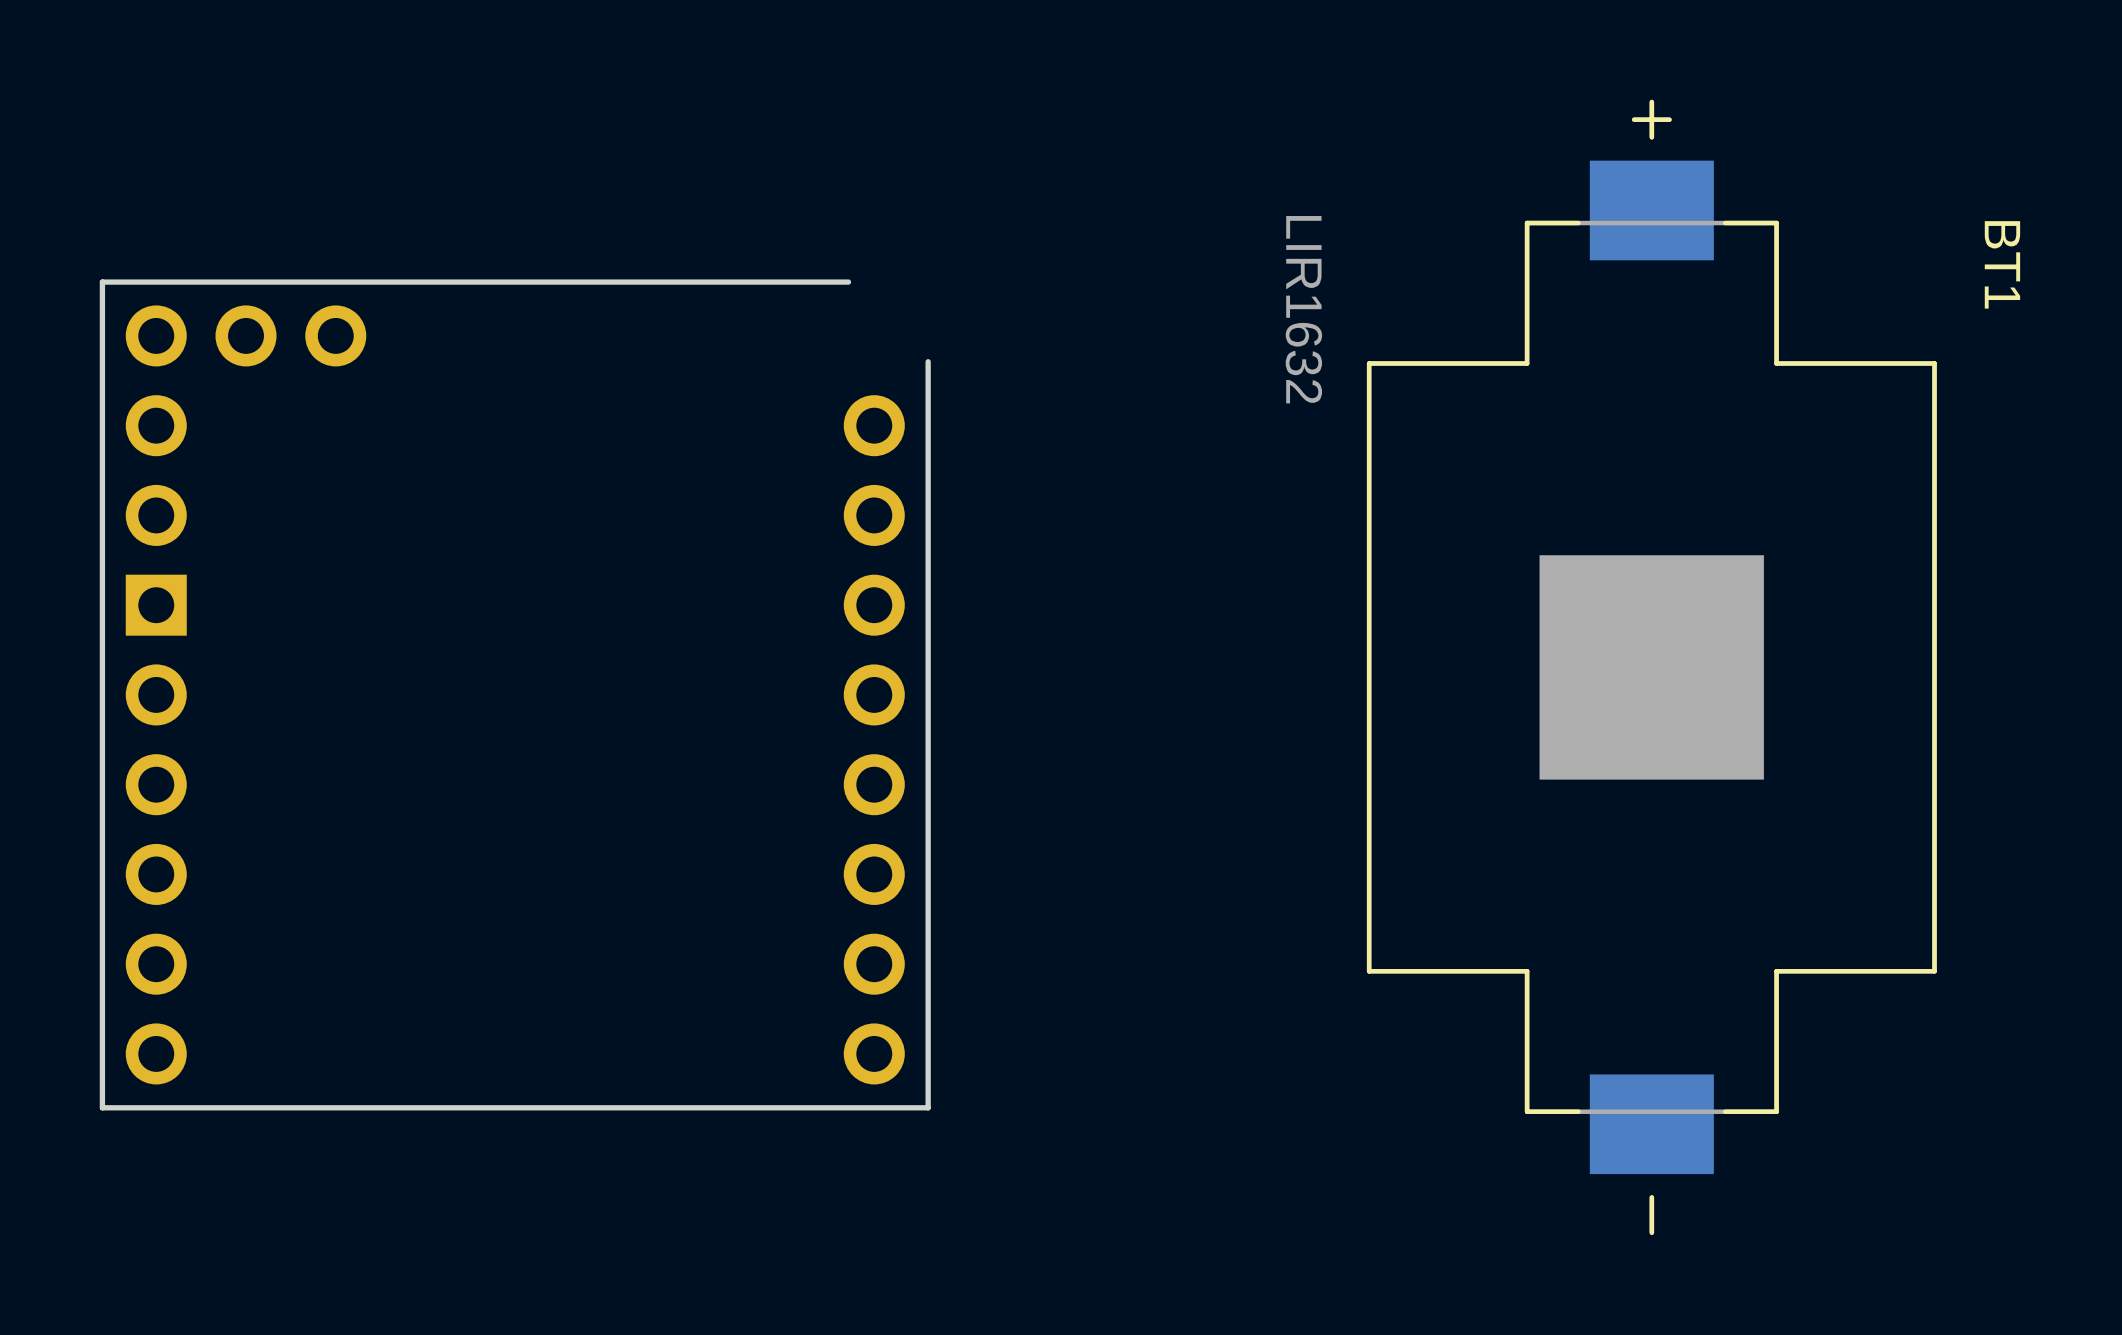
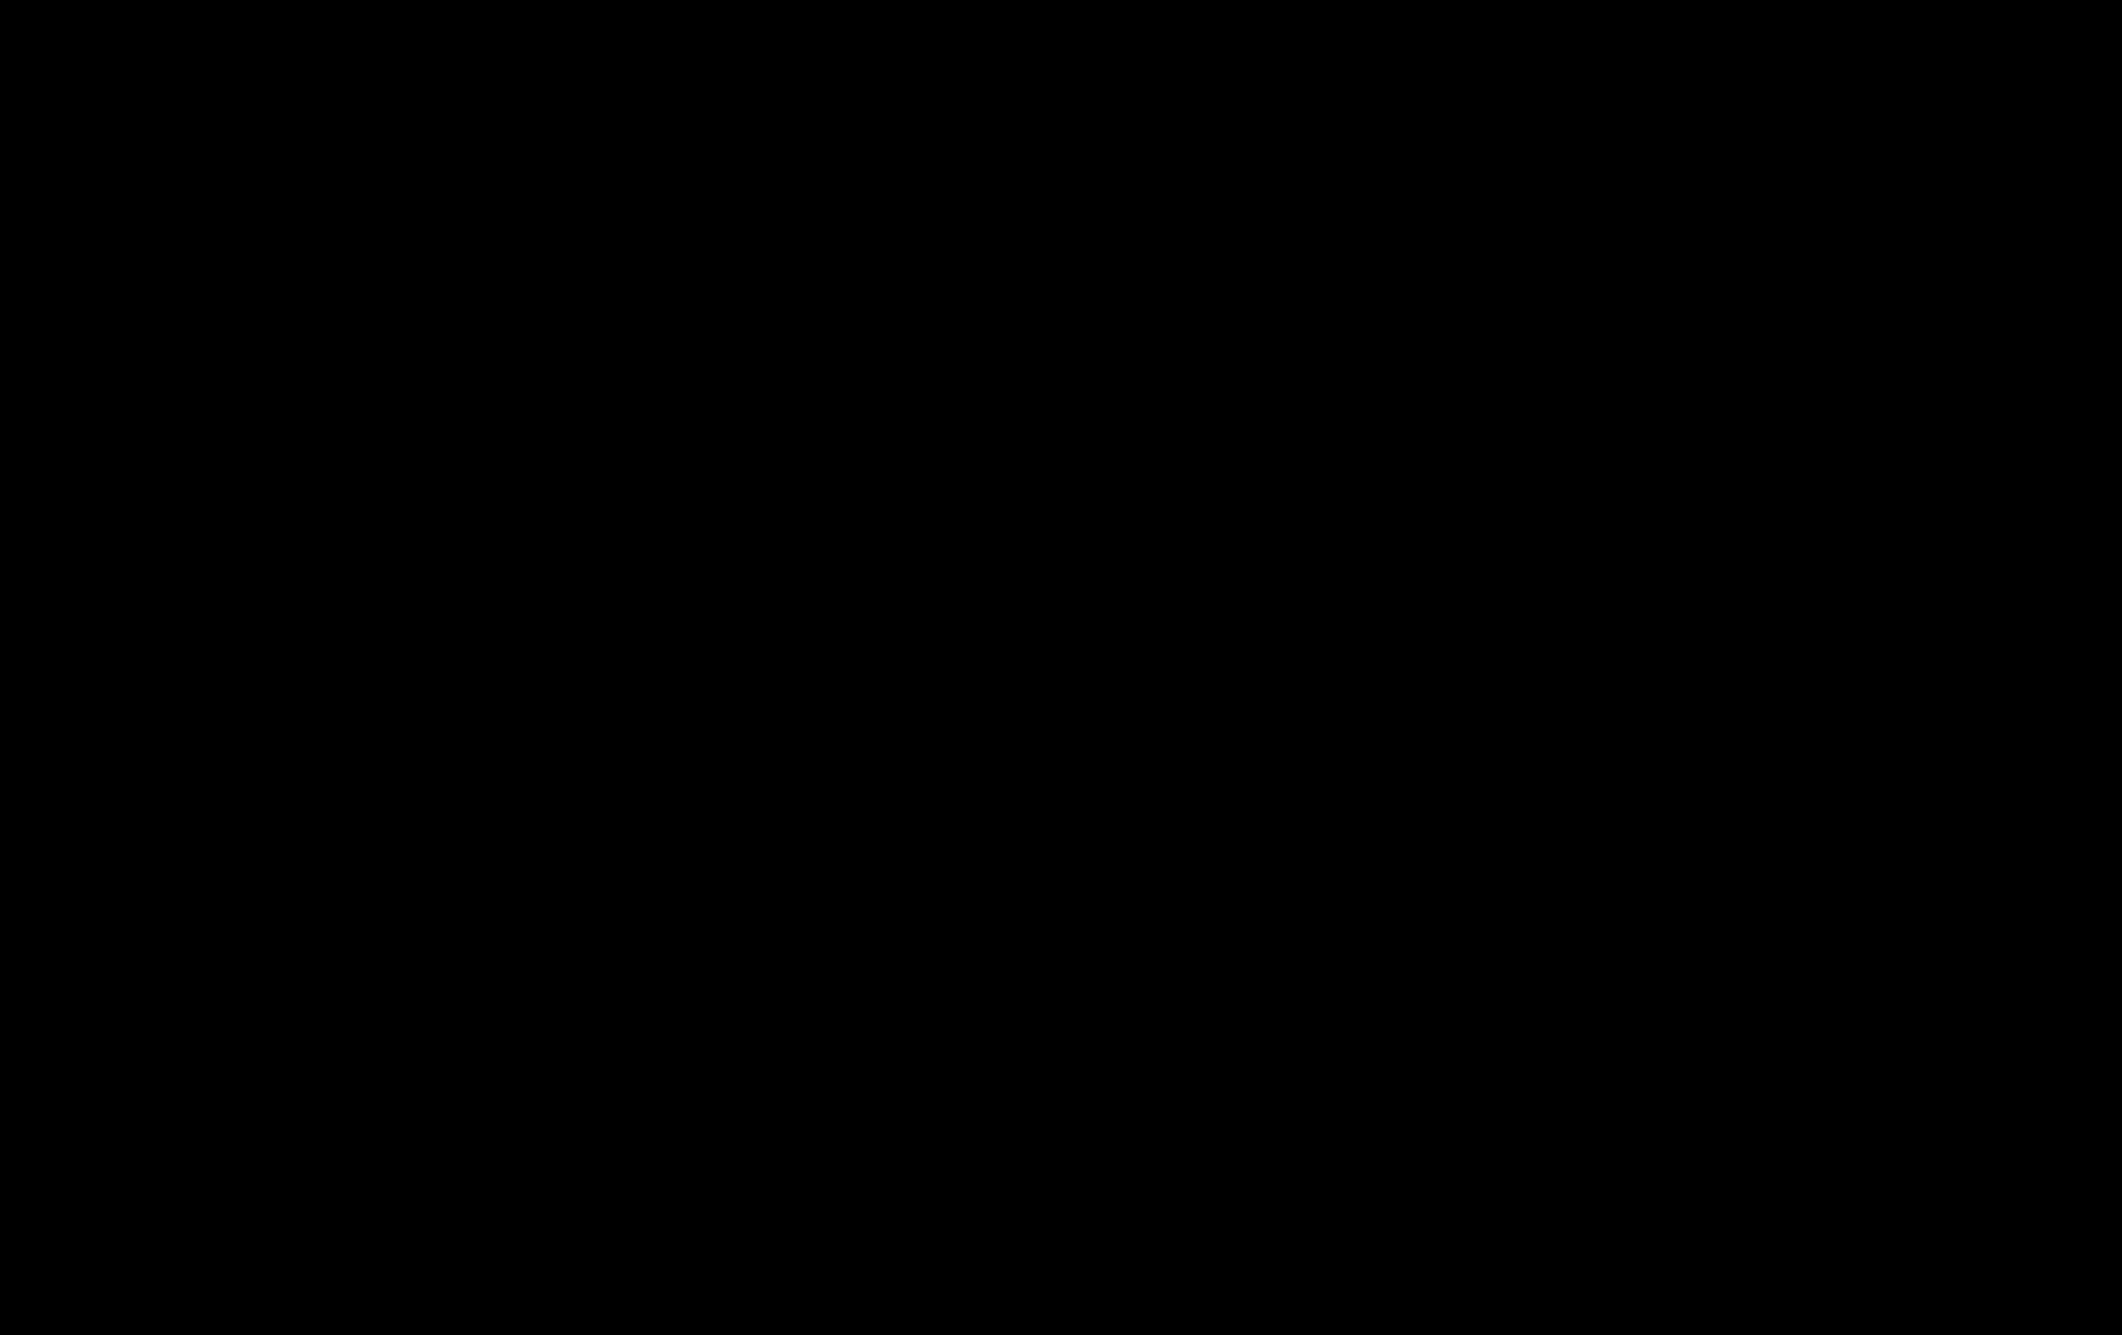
BT1: LIR1632 (1651, 667) -> none
part: (515, 694) -> none

